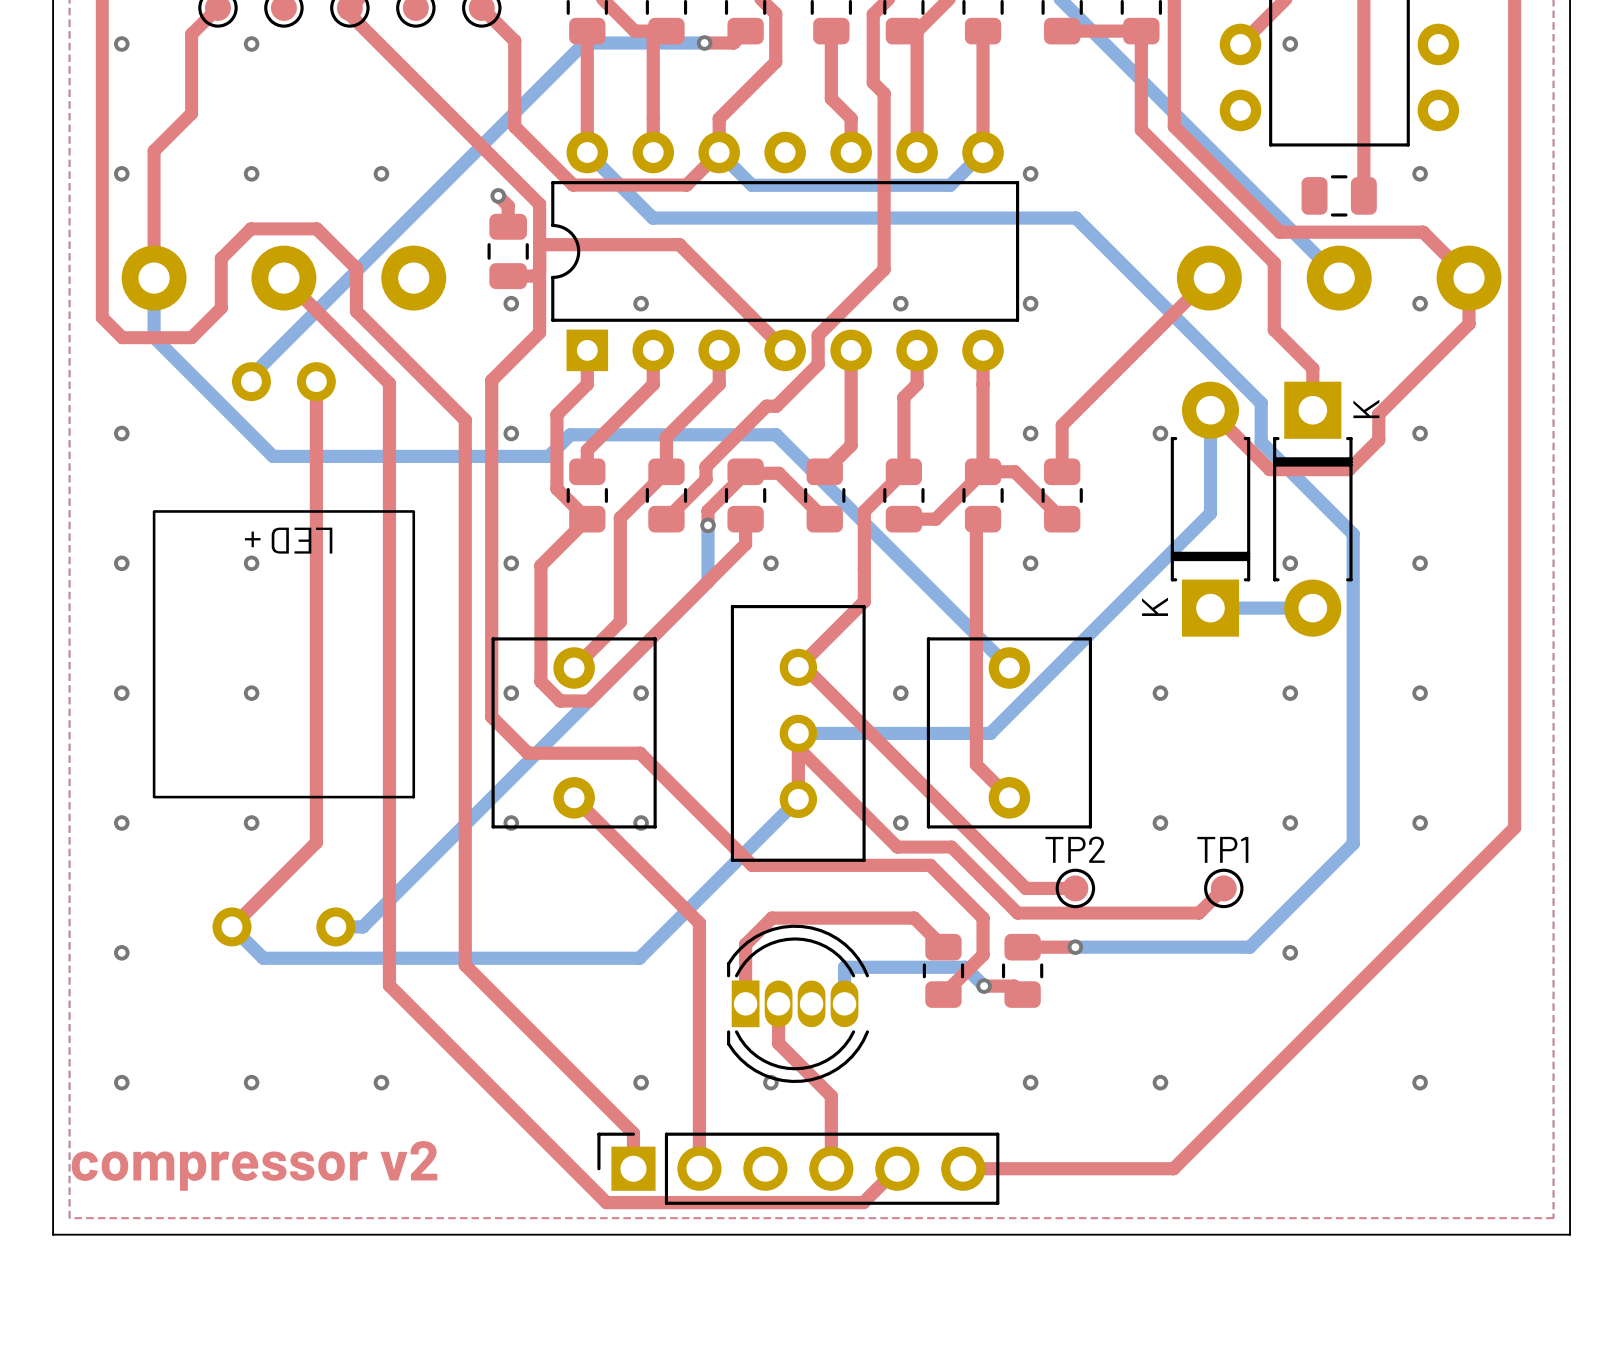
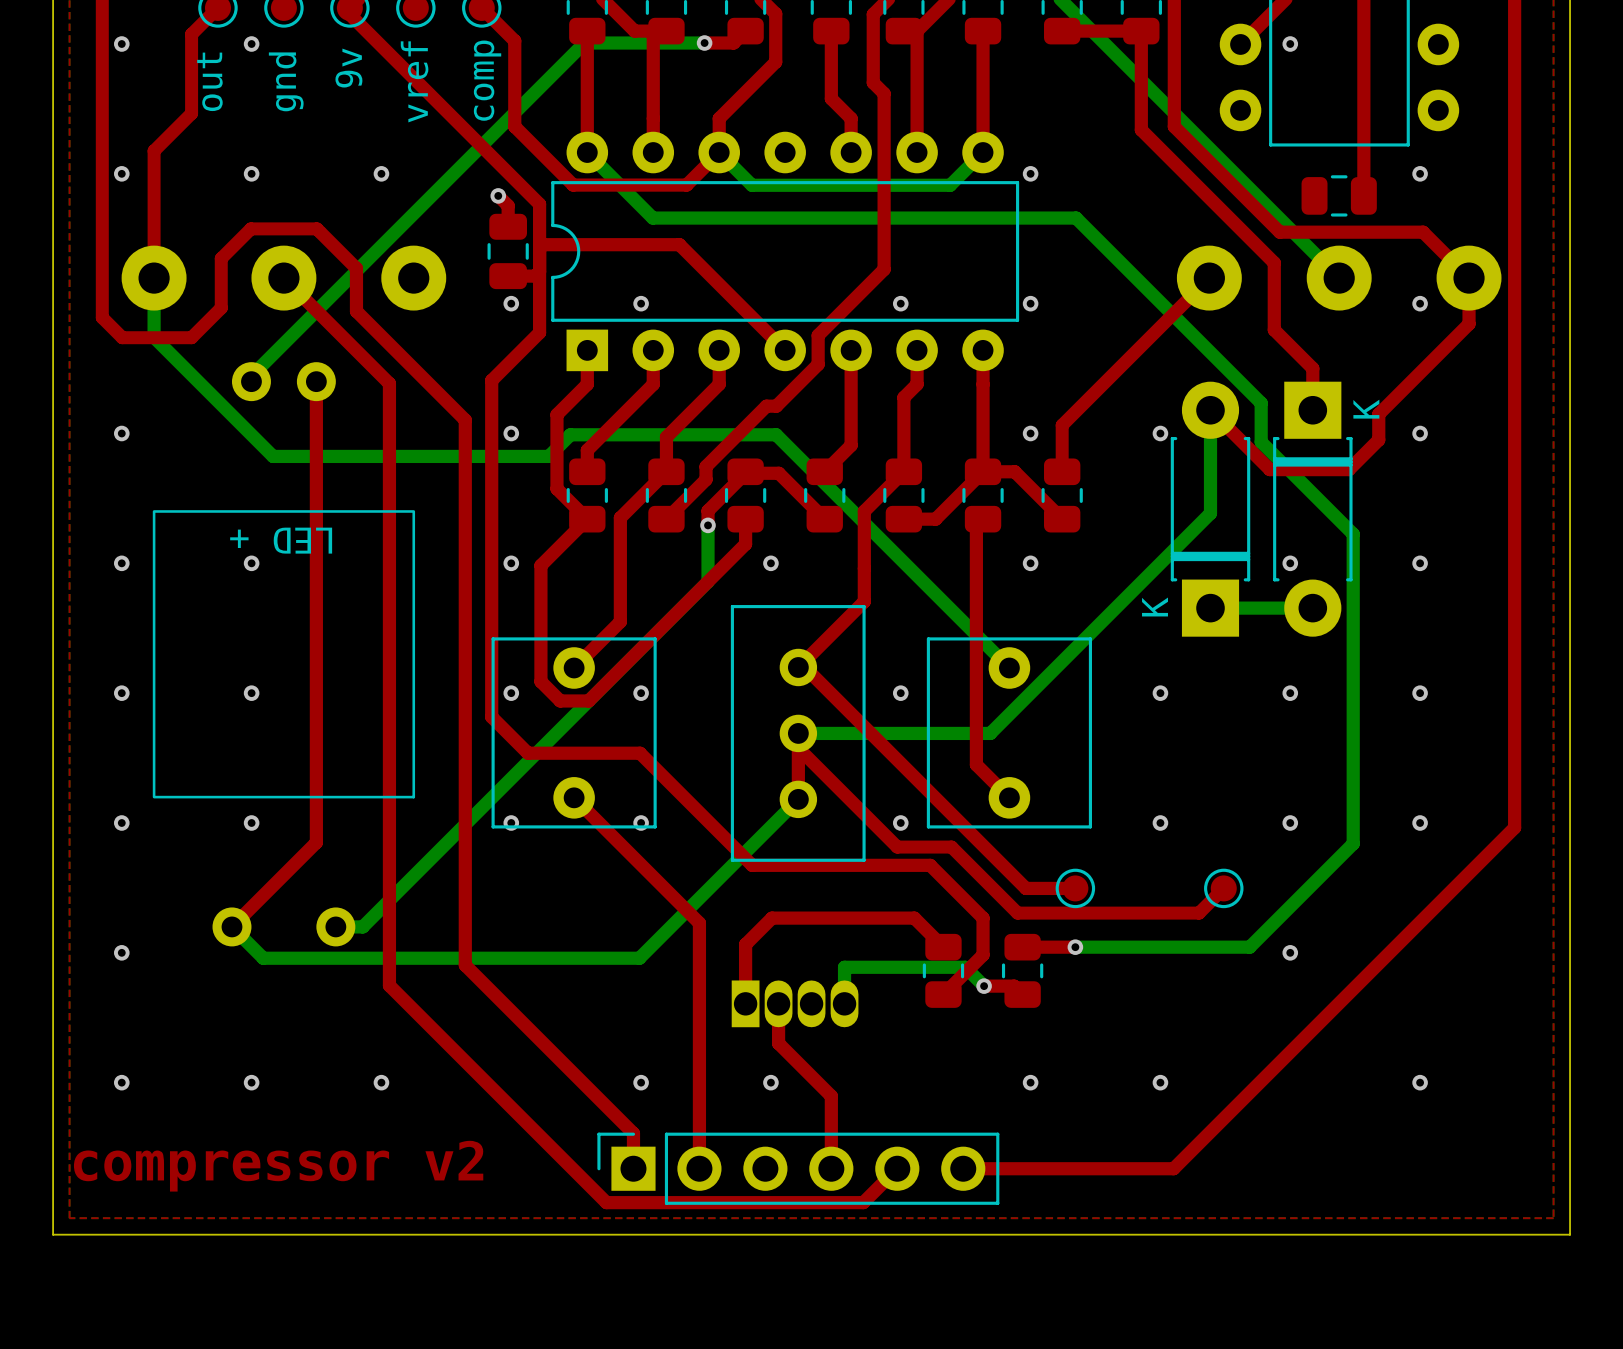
part value: none -> 9v (348, 68)
part value: none -> out (209, 81)
part value: none -> gnd (286, 81)
part value: none -> vref (414, 81)
part value: none -> comp (487, 80)
TP2 name: TP2 (1075, 849) -> none
TP1 name: TP1 (1222, 849) -> none
part side: top (798, 1003) -> bottom (795, 1003)

